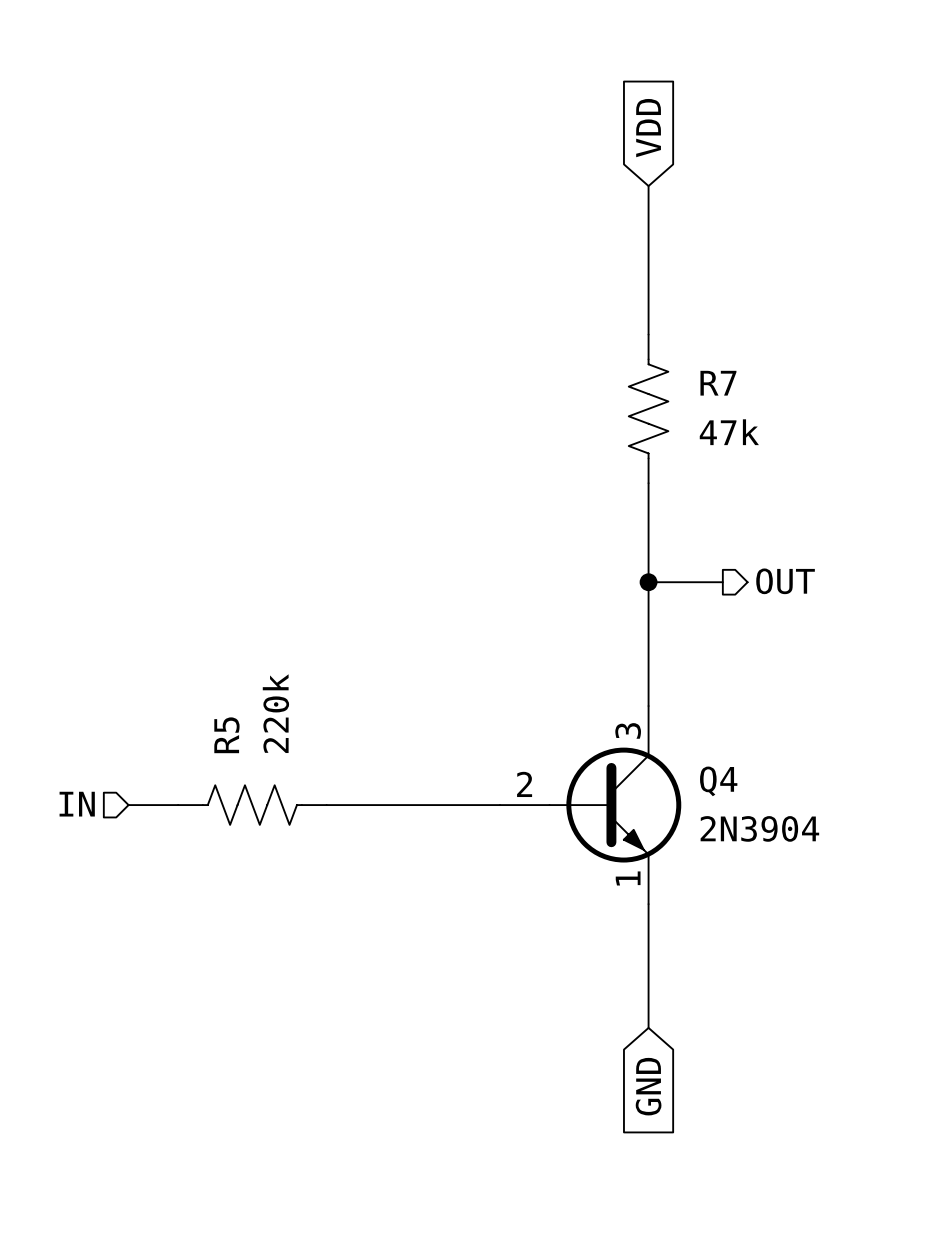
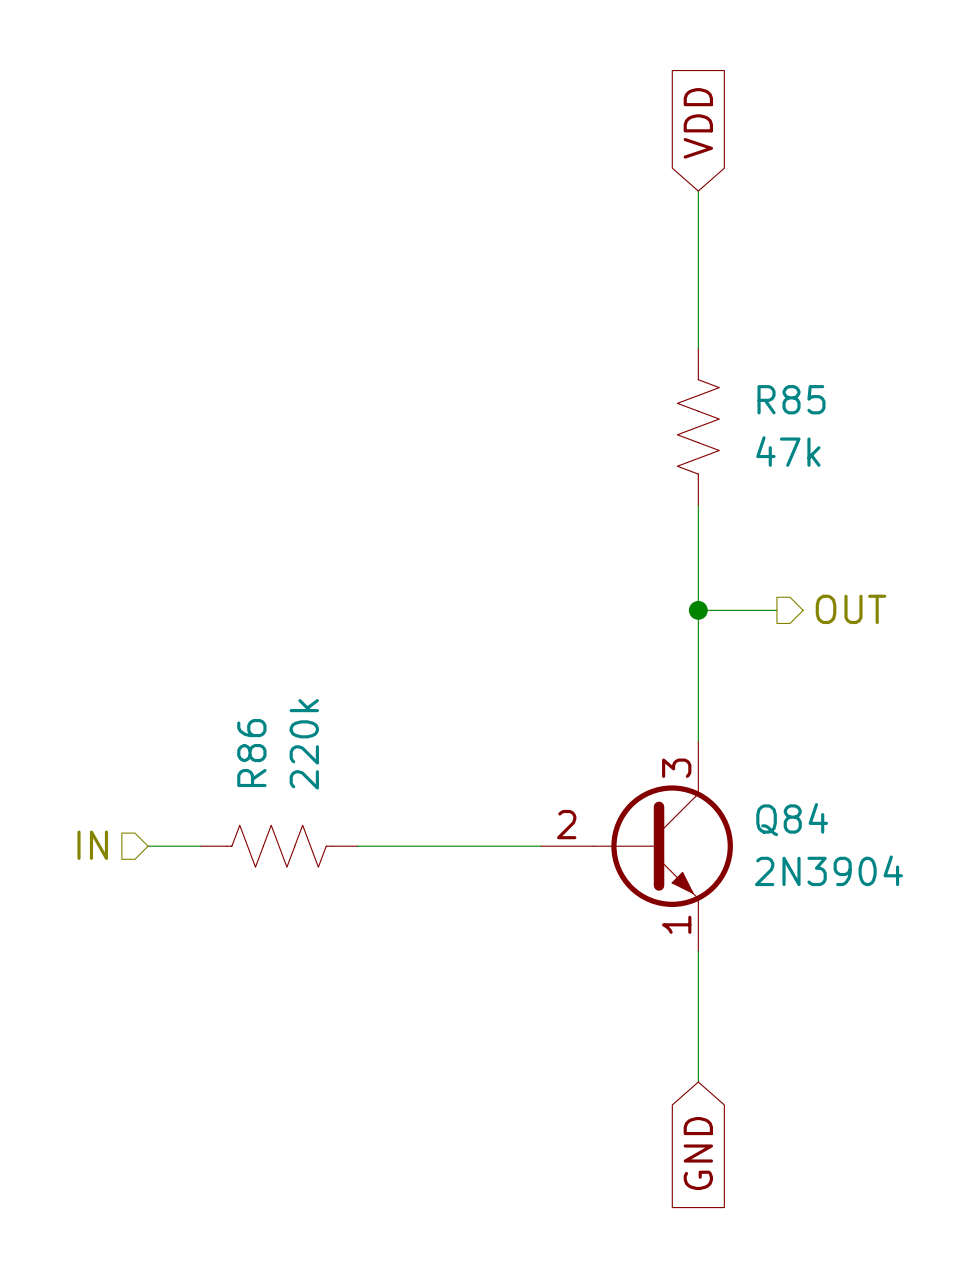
R7 name: R7 (718, 383) -> R85 (791, 399)
R5 name: R5 (226, 735) -> R86 (251, 753)
Q4 name: Q4 (718, 781) -> Q84 (792, 819)

